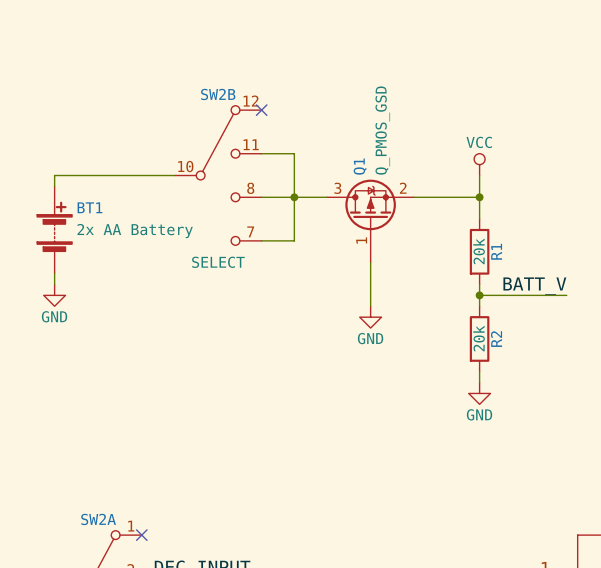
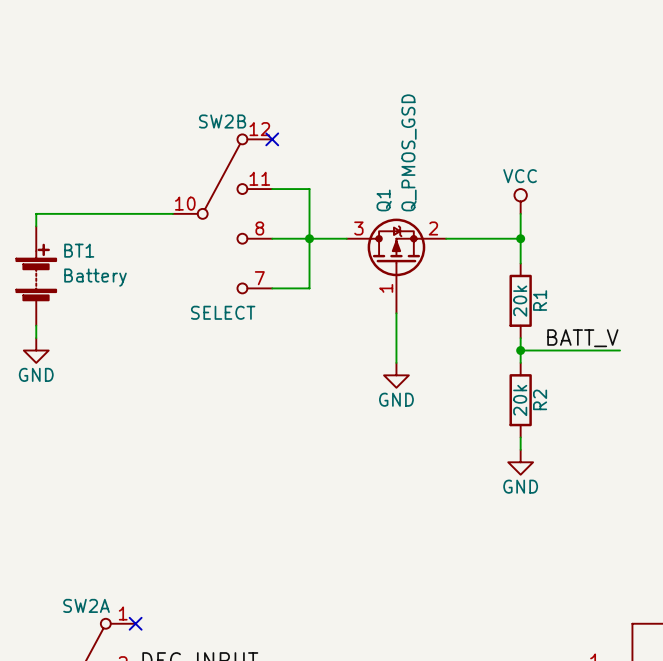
BT1 value: 2x AA Battery (135, 231) -> Battery (95, 277)

